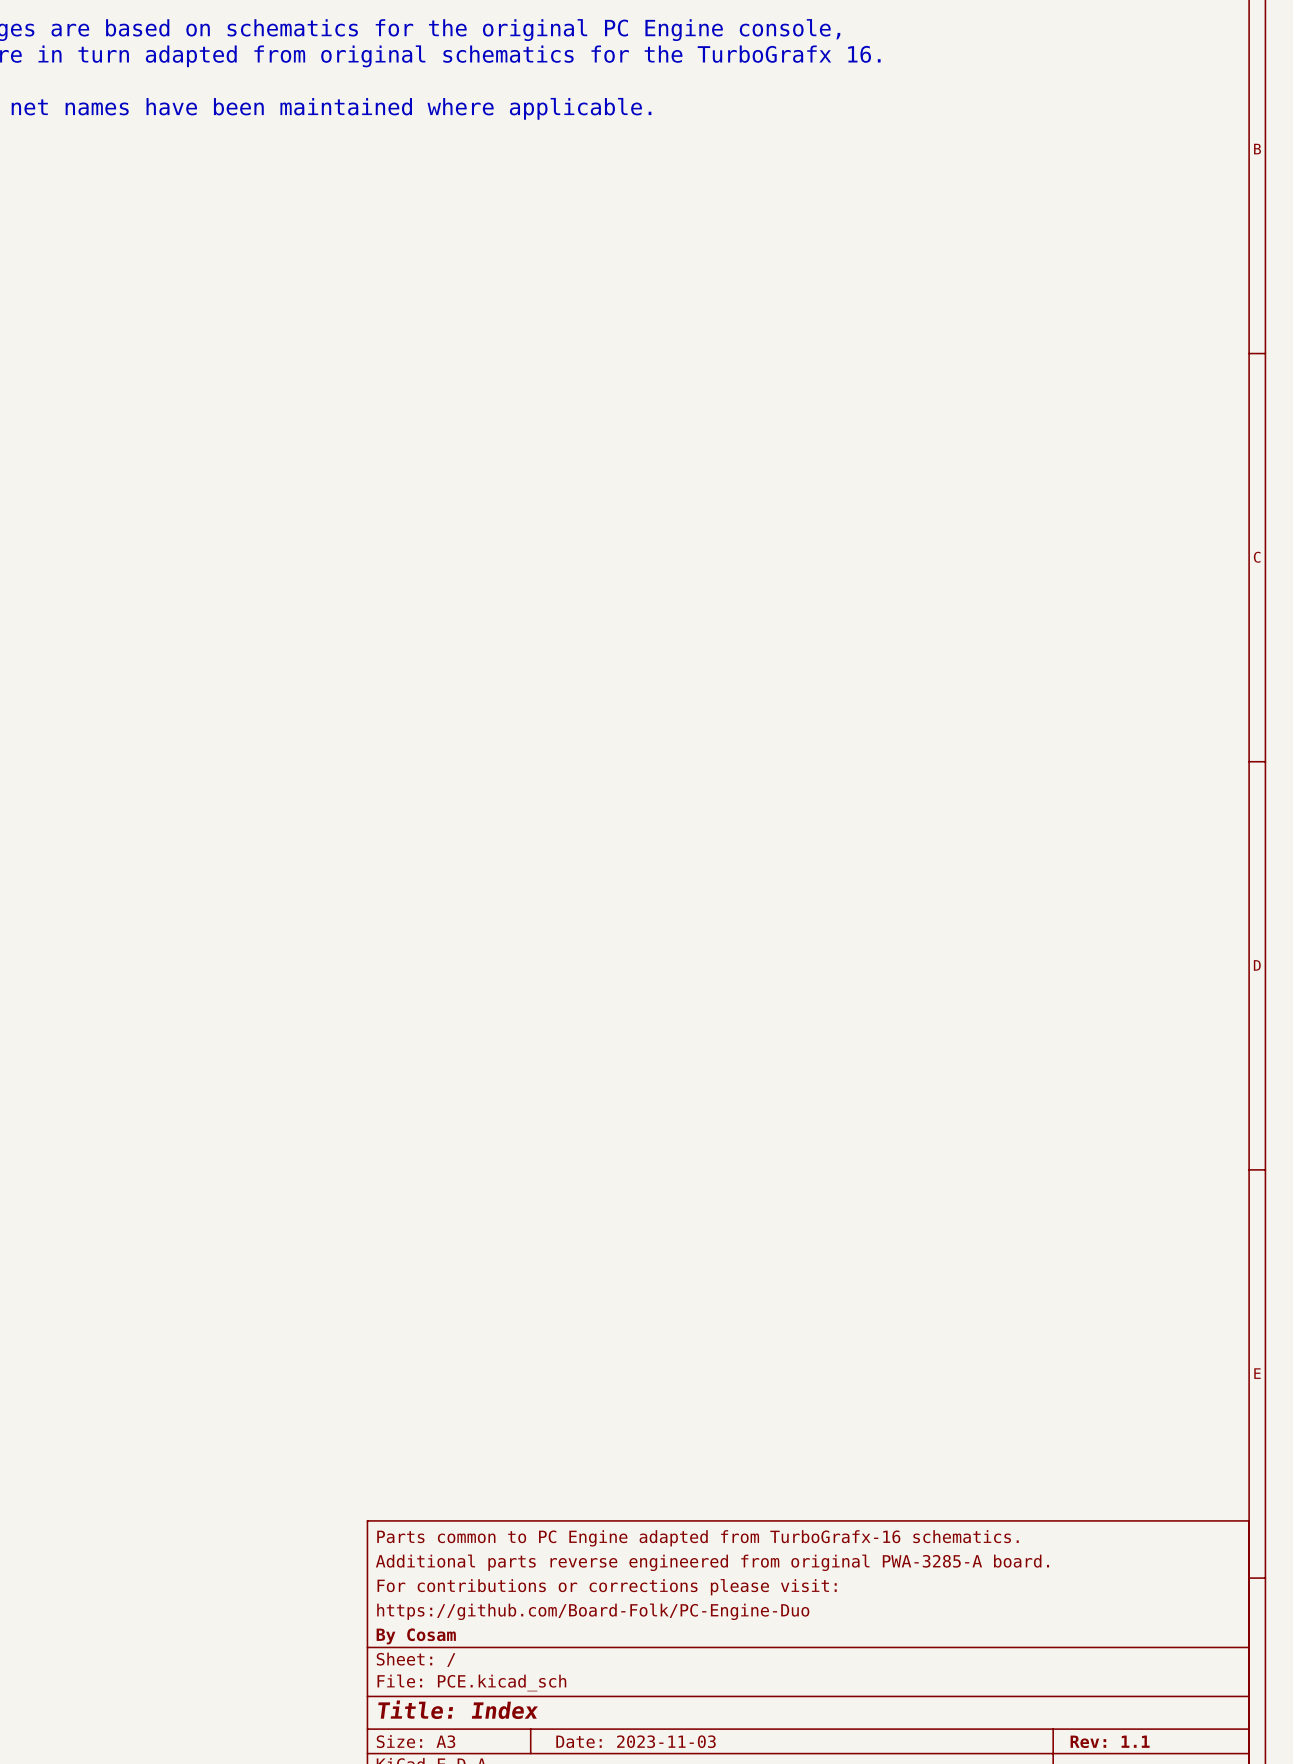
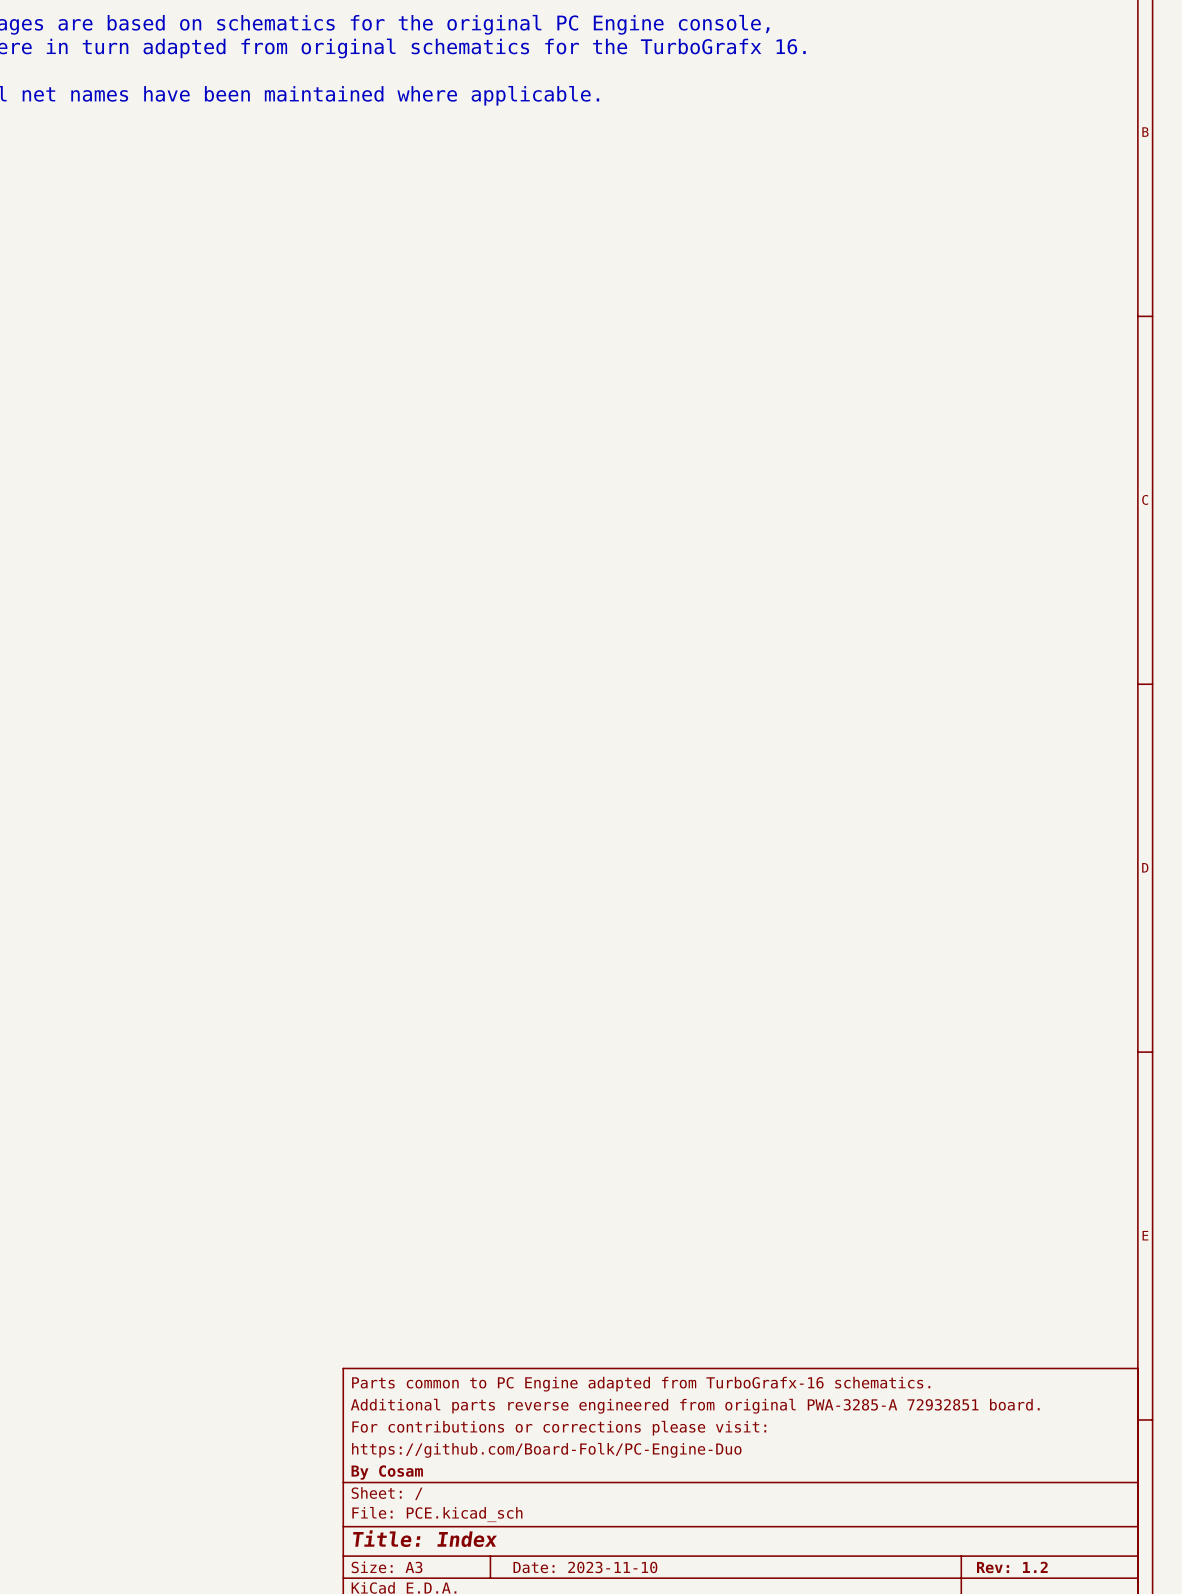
title block: Additional parts reverse engineered from original PWA-3285-A board. (712, 1562) -> Additional parts reverse engineered from original PWA-3285-A 72932851 board. (695, 1406)
title block: Date: 2023-11-03 (636, 1741) -> Date: 2023-11-10 (585, 1567)
title block: Rev: 1.1 (1110, 1741) -> Rev: 1.2 (1012, 1567)

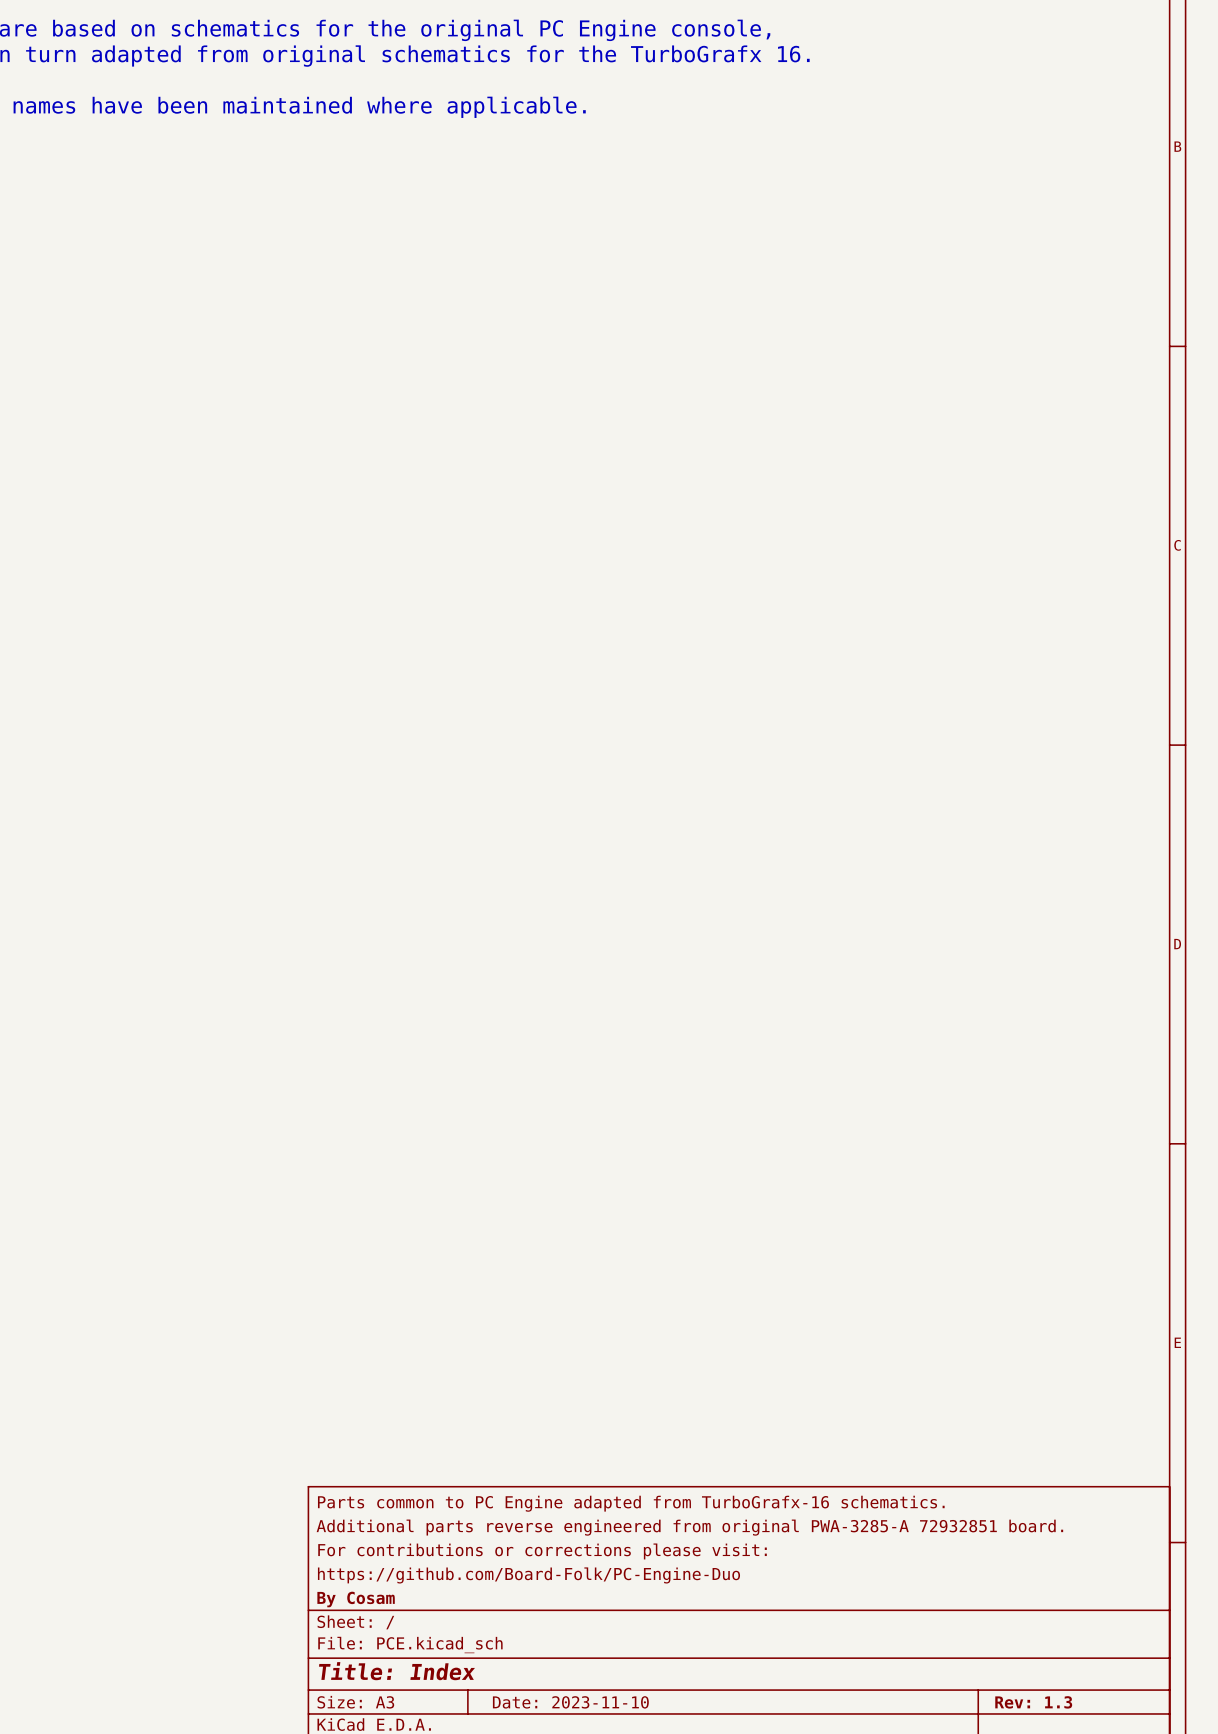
title block: Rev: 1.2 (1012, 1567) -> Rev: 1.3 (1033, 1702)

